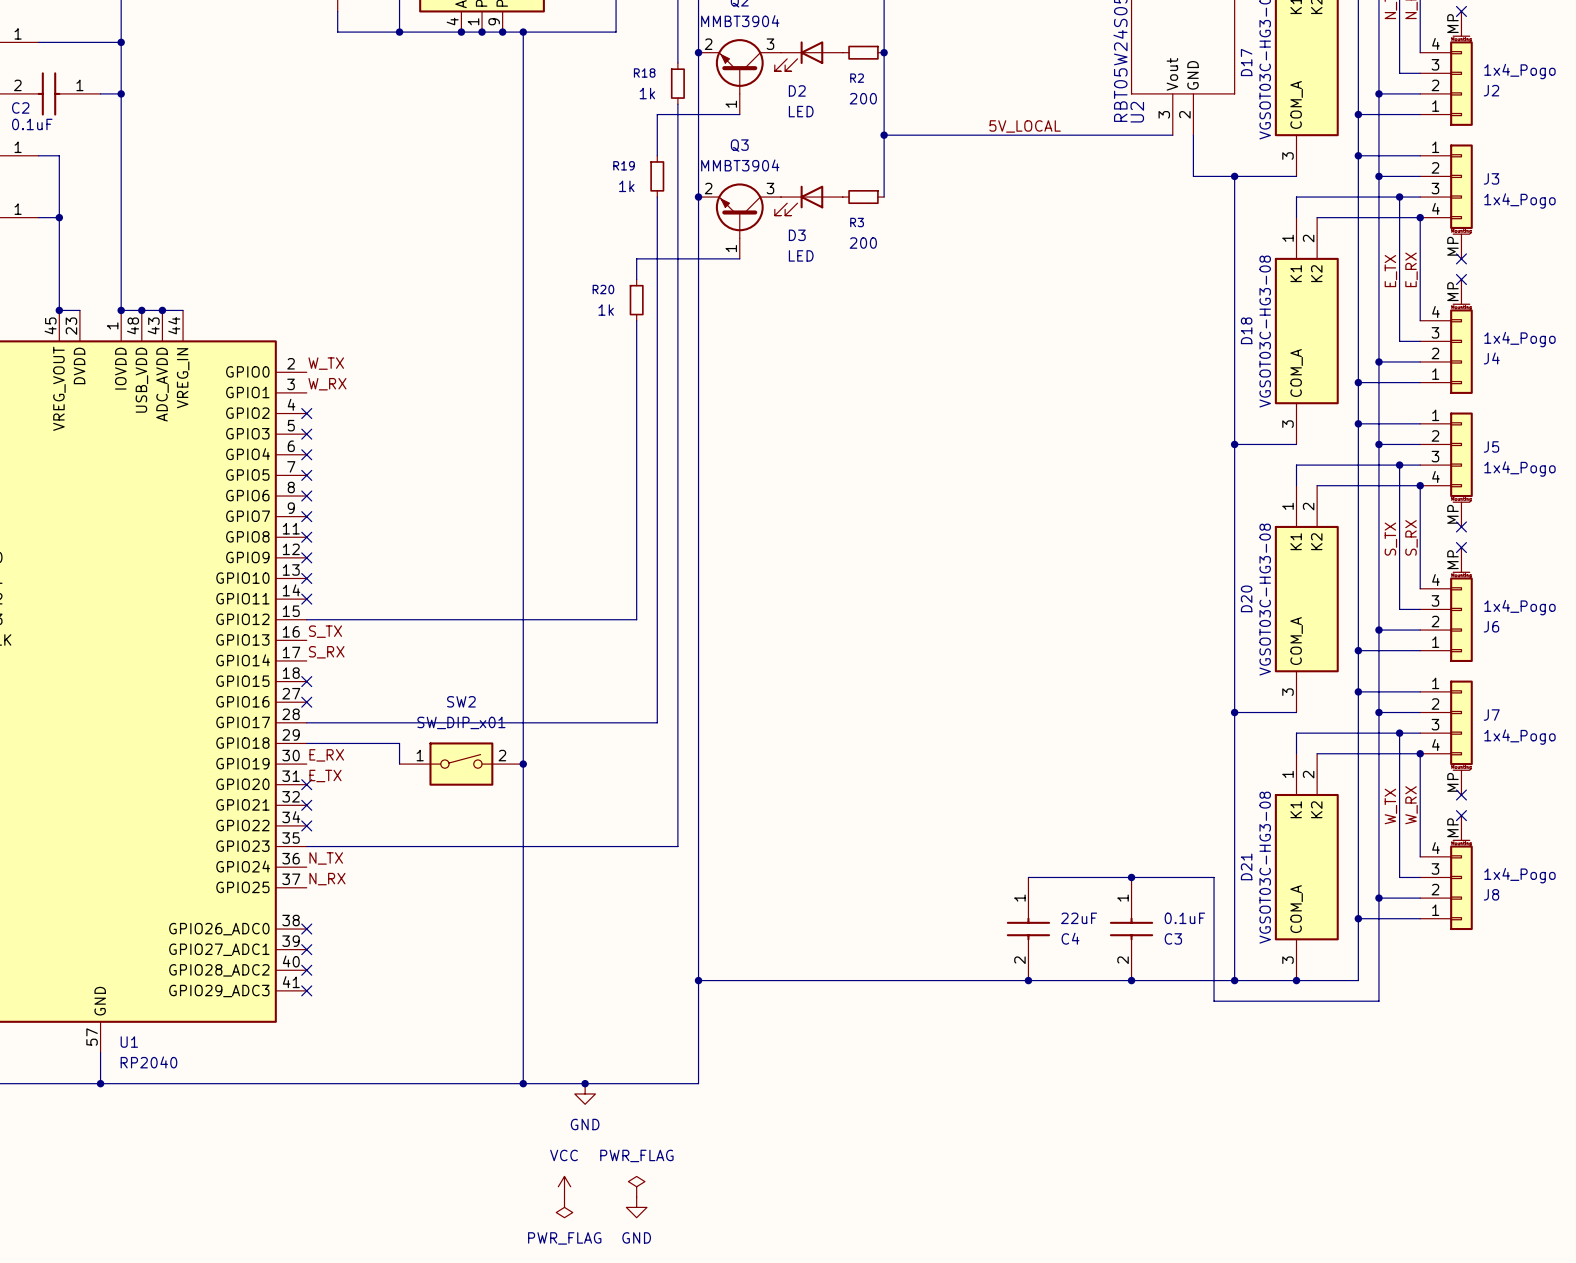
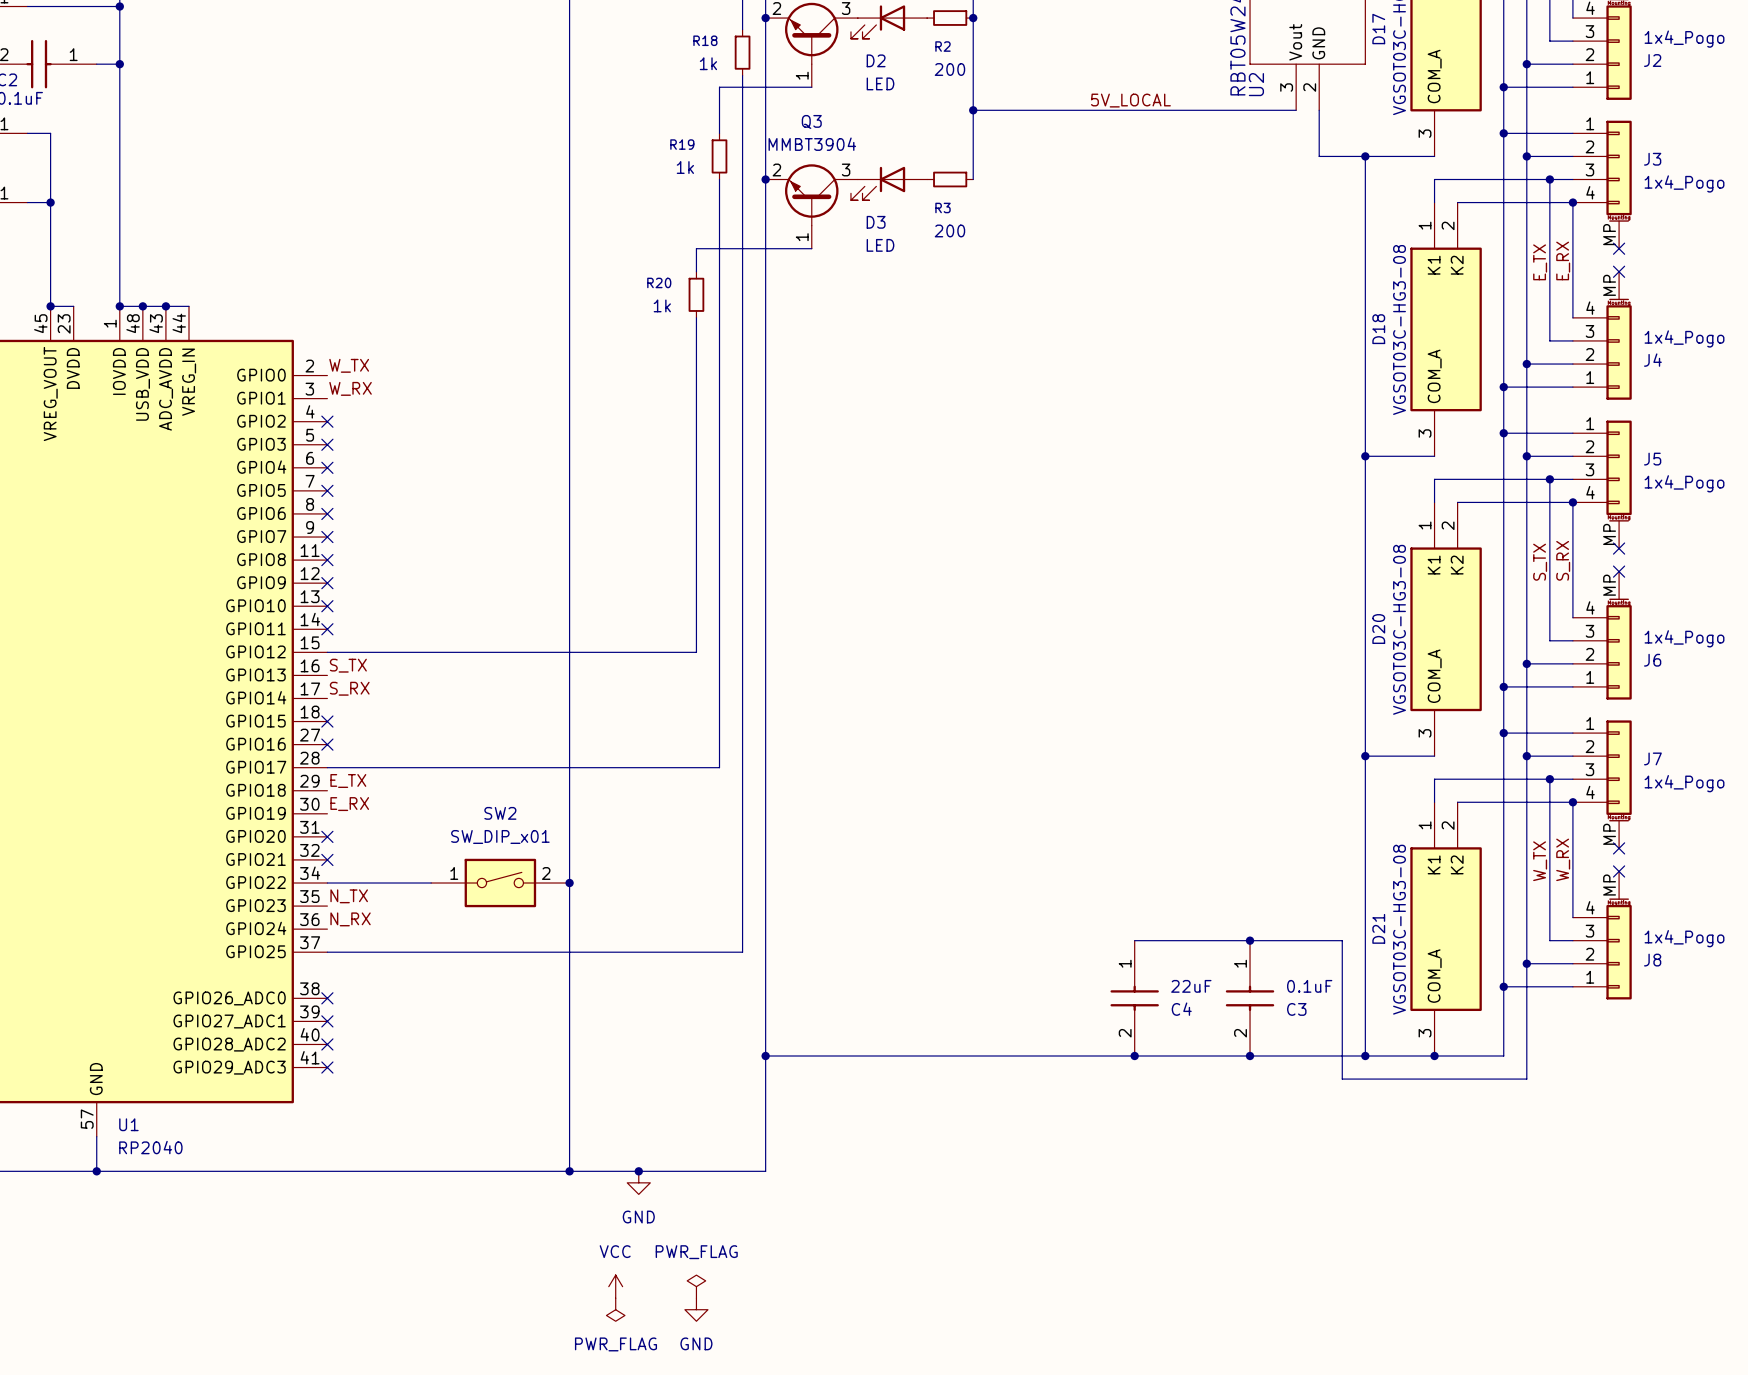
wire: (306, 743) (399, 743) (399, 764) -> none
SW2 position: (461, 764) -> (500, 883)
junction: (523, 764) -> none
label position: E_TX (325, 775) -> E_TX (348, 781)
wire: none -> (327, 883) (431, 883)
no-connect mark: (306, 825) -> none
junction: none -> (569, 883)
label: none -> N_TX (349, 896)
wire: (306, 846) (677, 846) -> (327, 952) (742, 952) (742, 906)
label: N_TX (326, 858) -> N_RX (350, 919)
label: N_RX (327, 879) -> none

